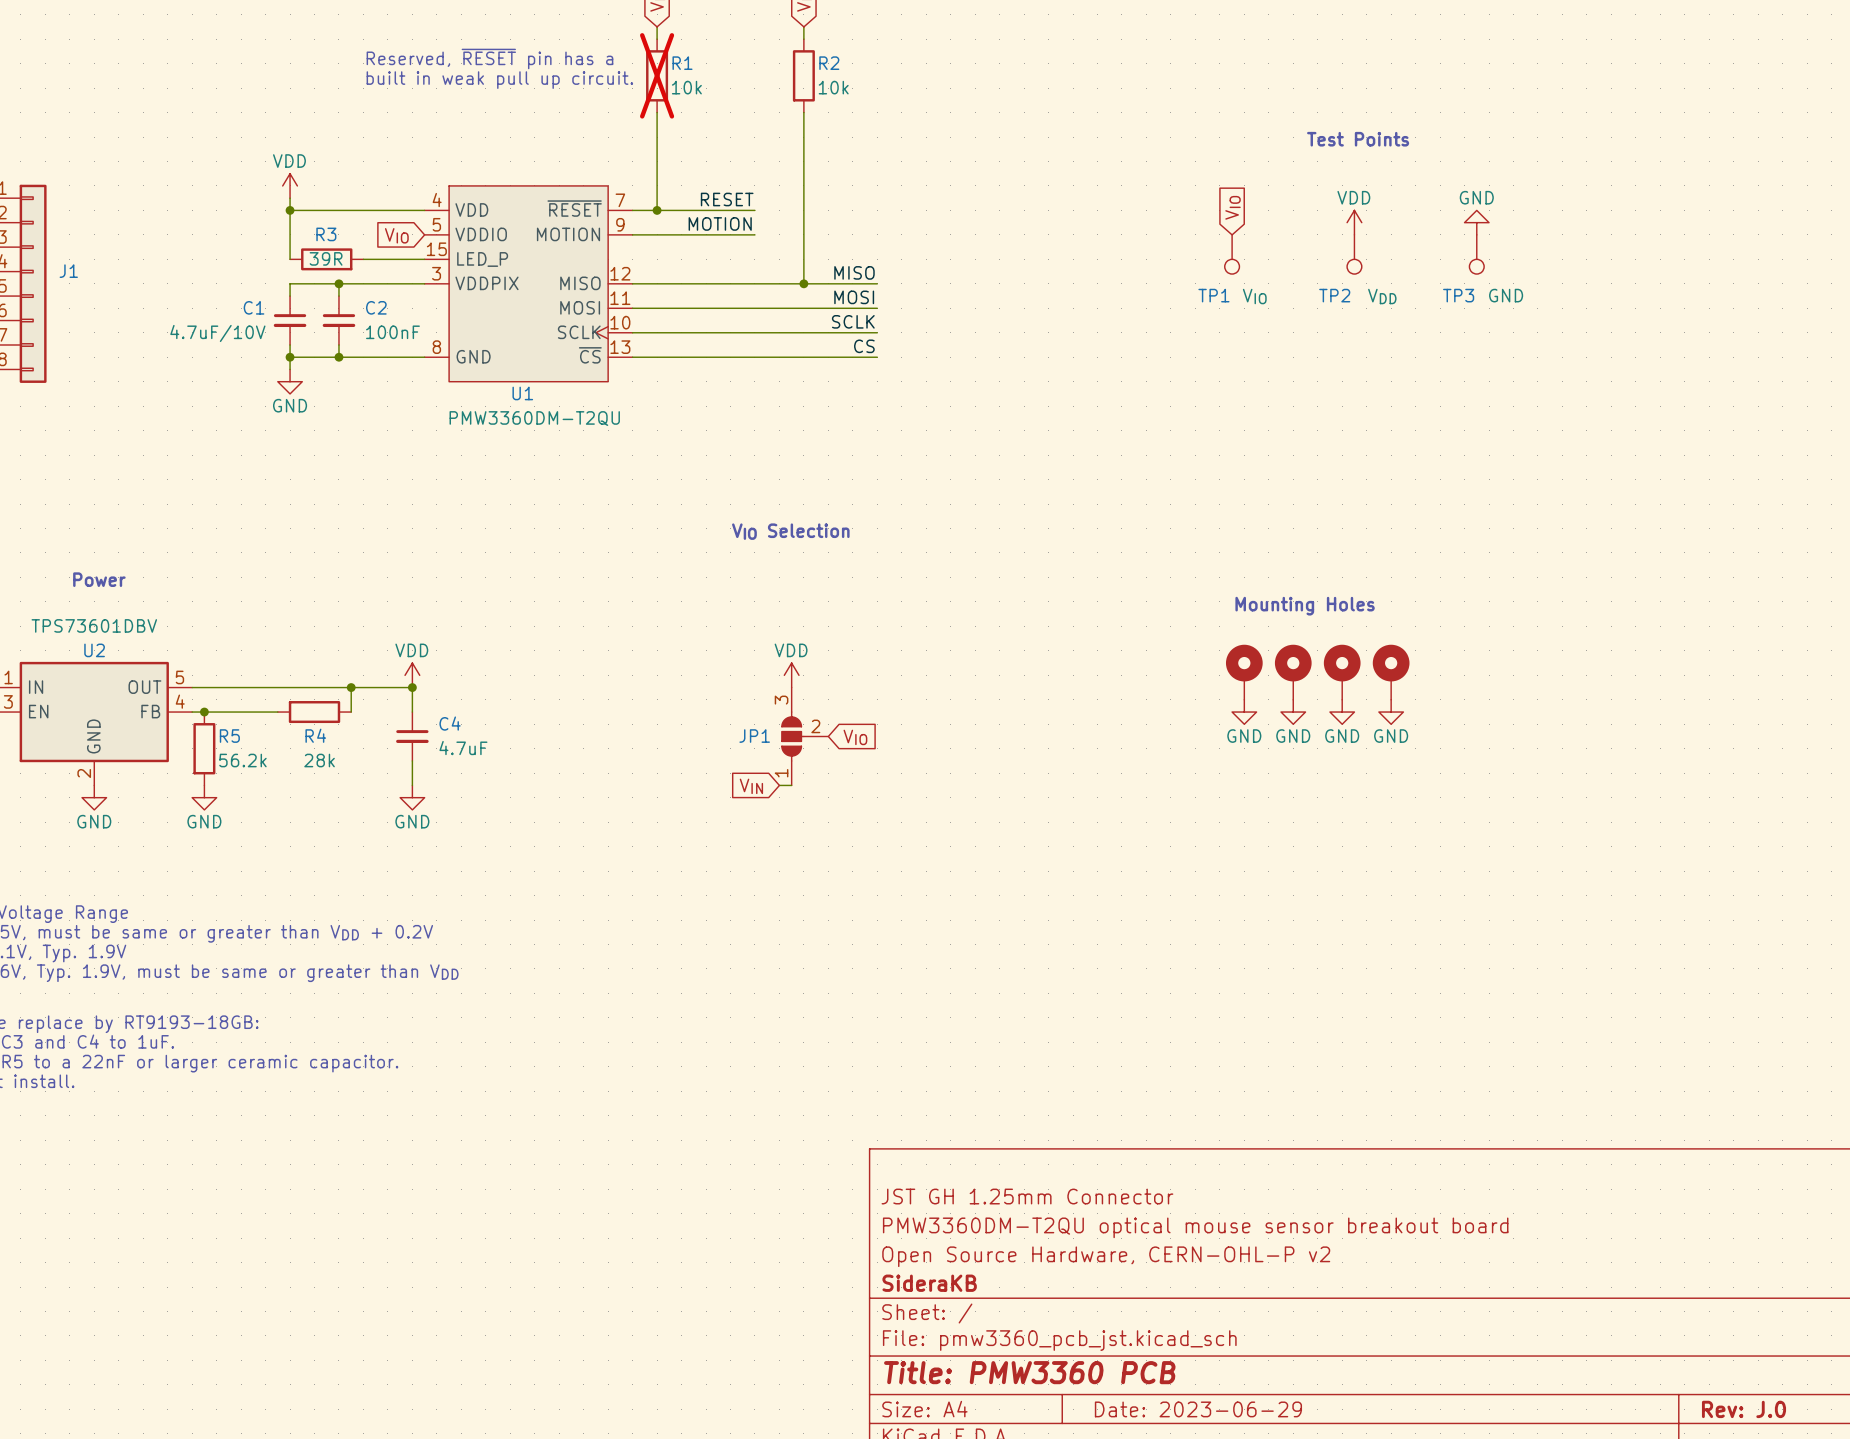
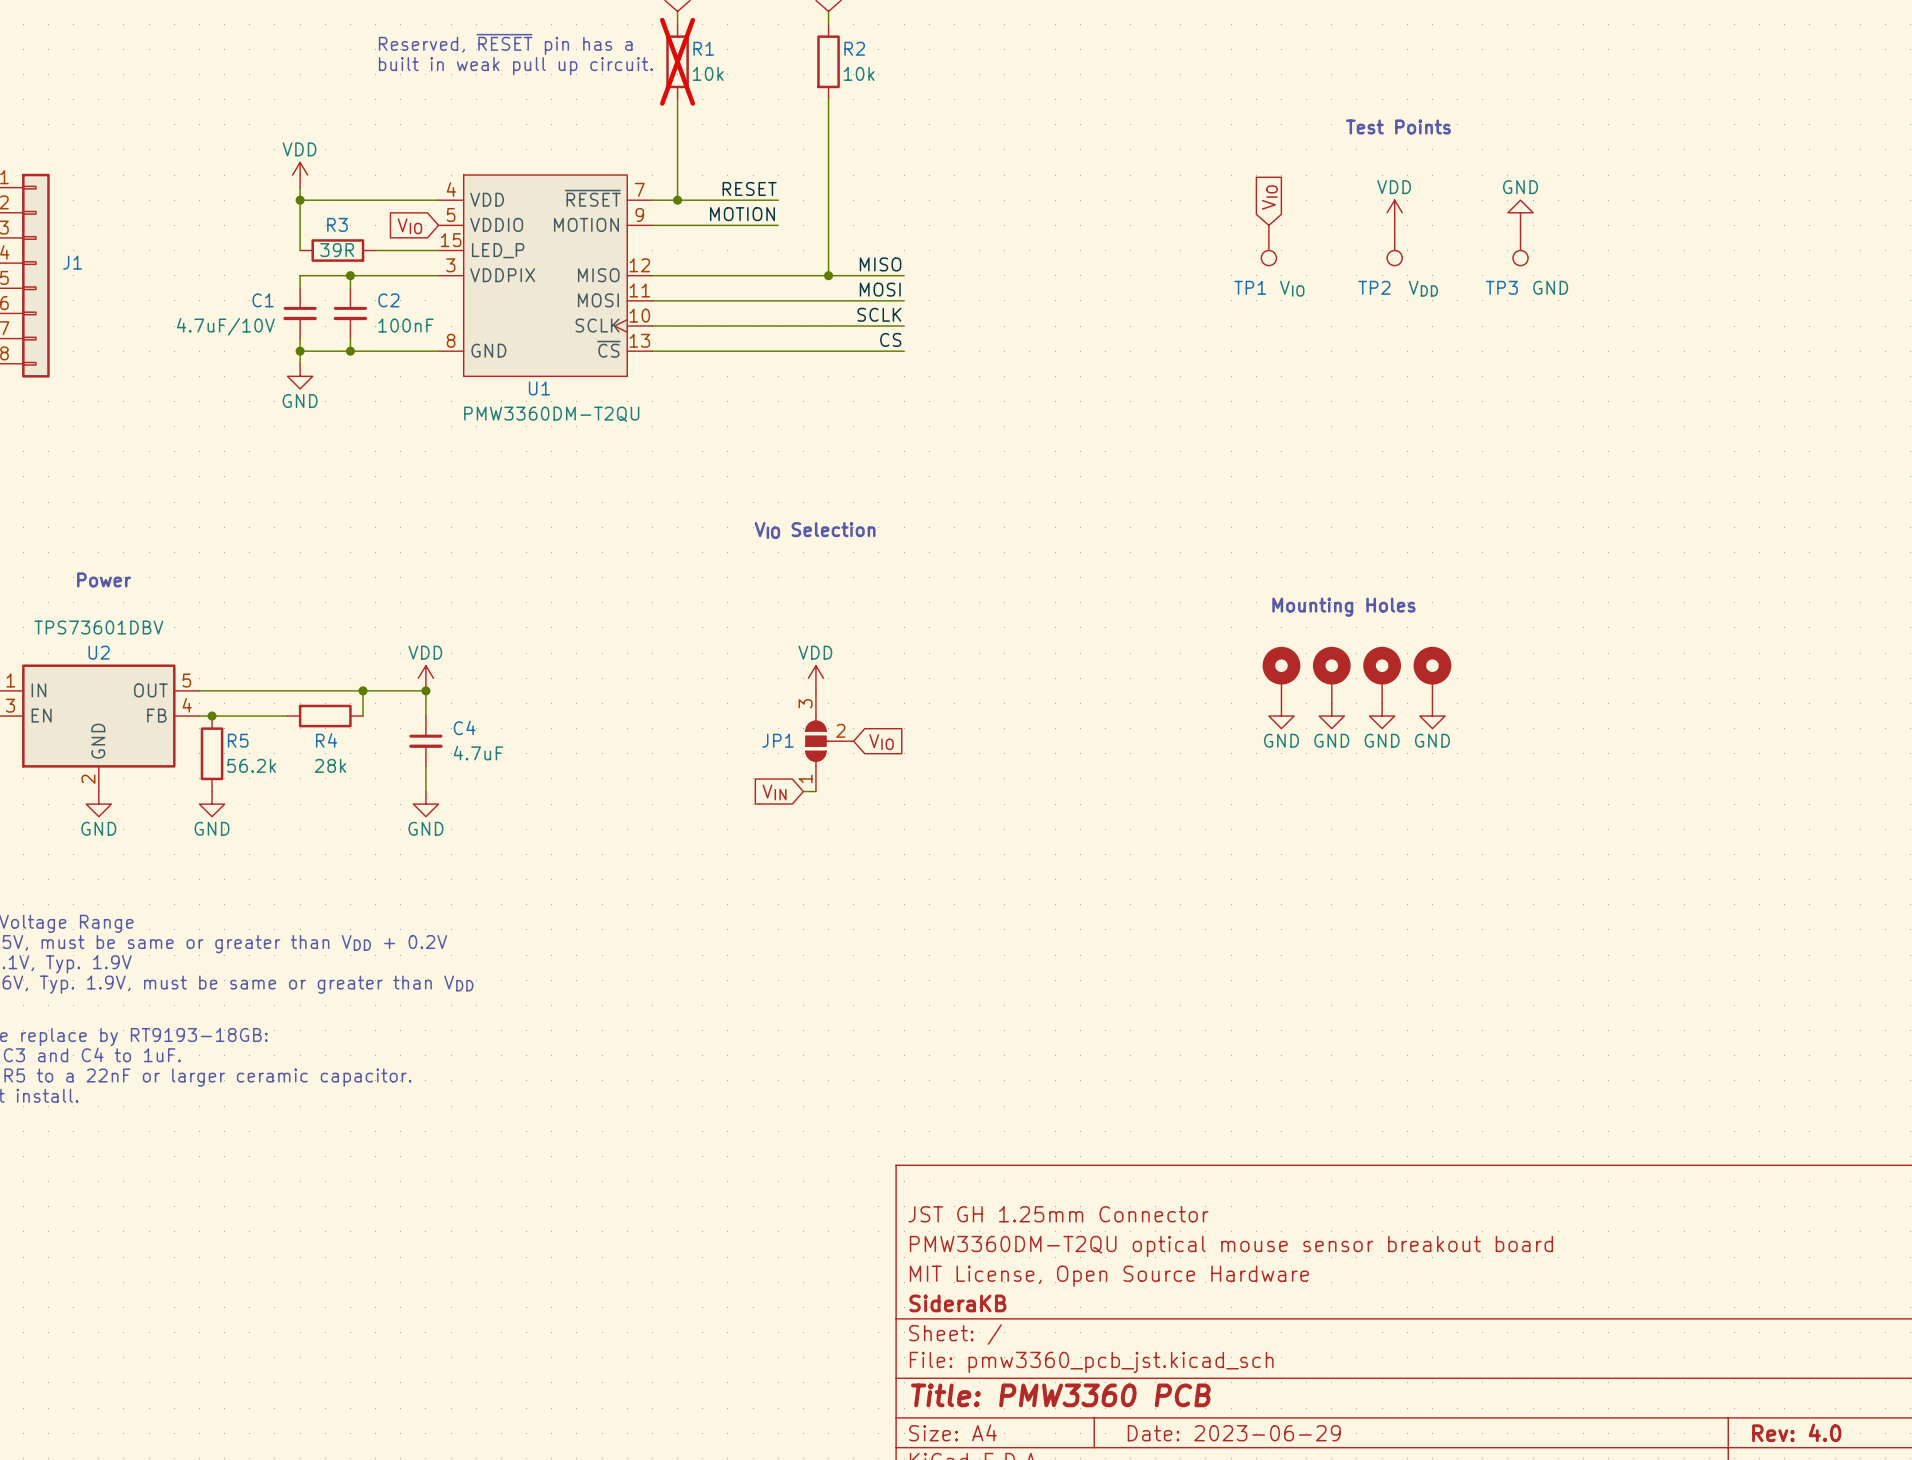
title block: Open Source Hardware, CERN-OHL-P v2 (1106, 1256) -> MIT License, Open Source Hardware (1109, 1276)
title block: Rev: J.0 (1744, 1409) -> Rev: 4.0 (1796, 1432)

